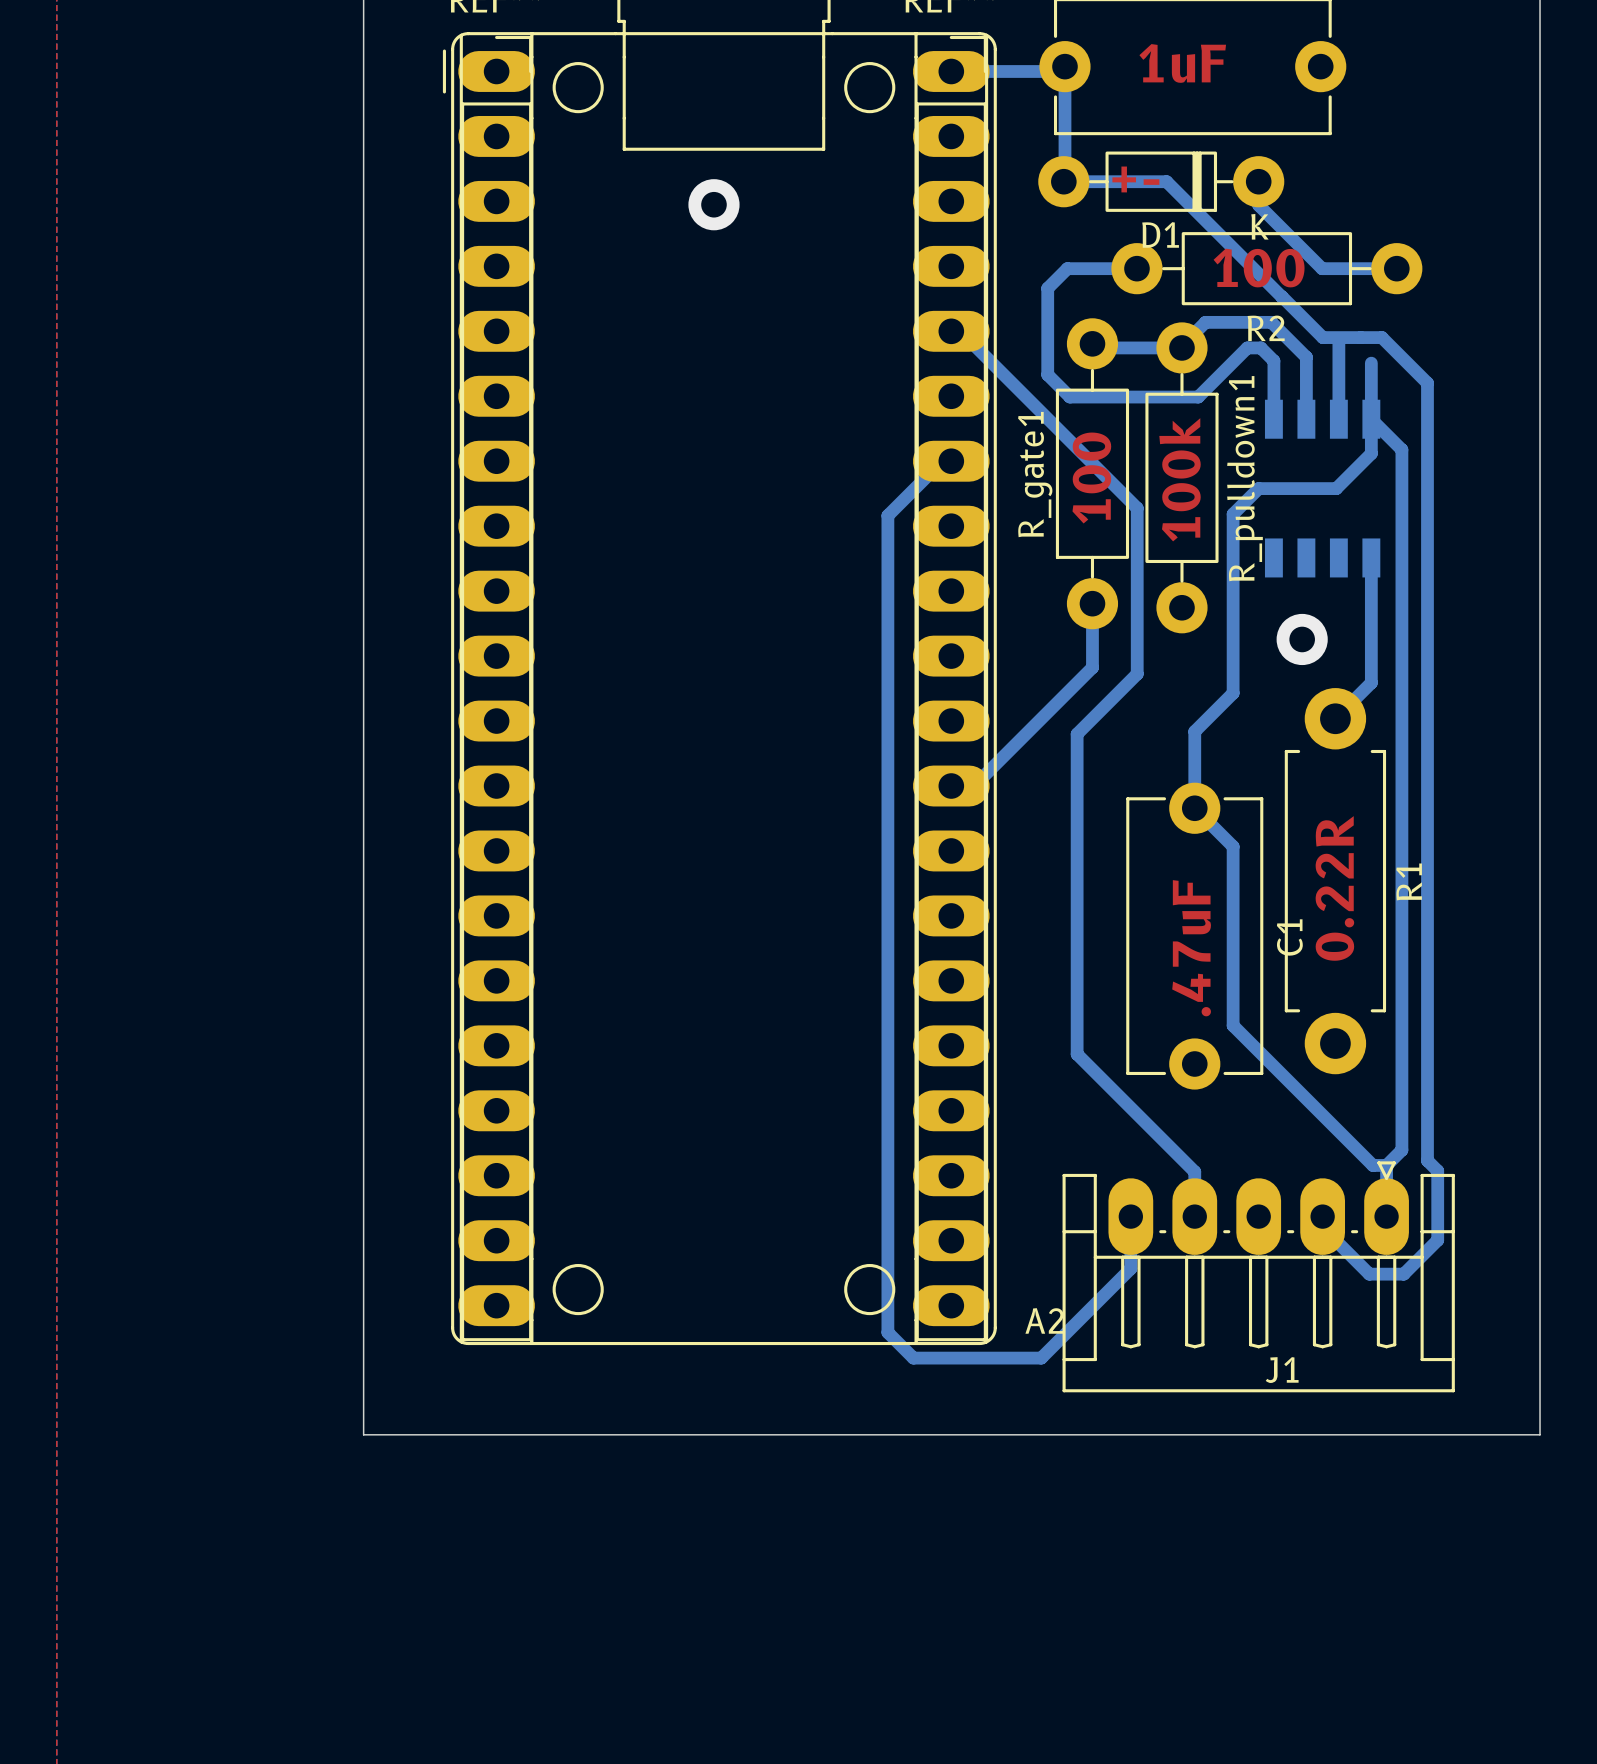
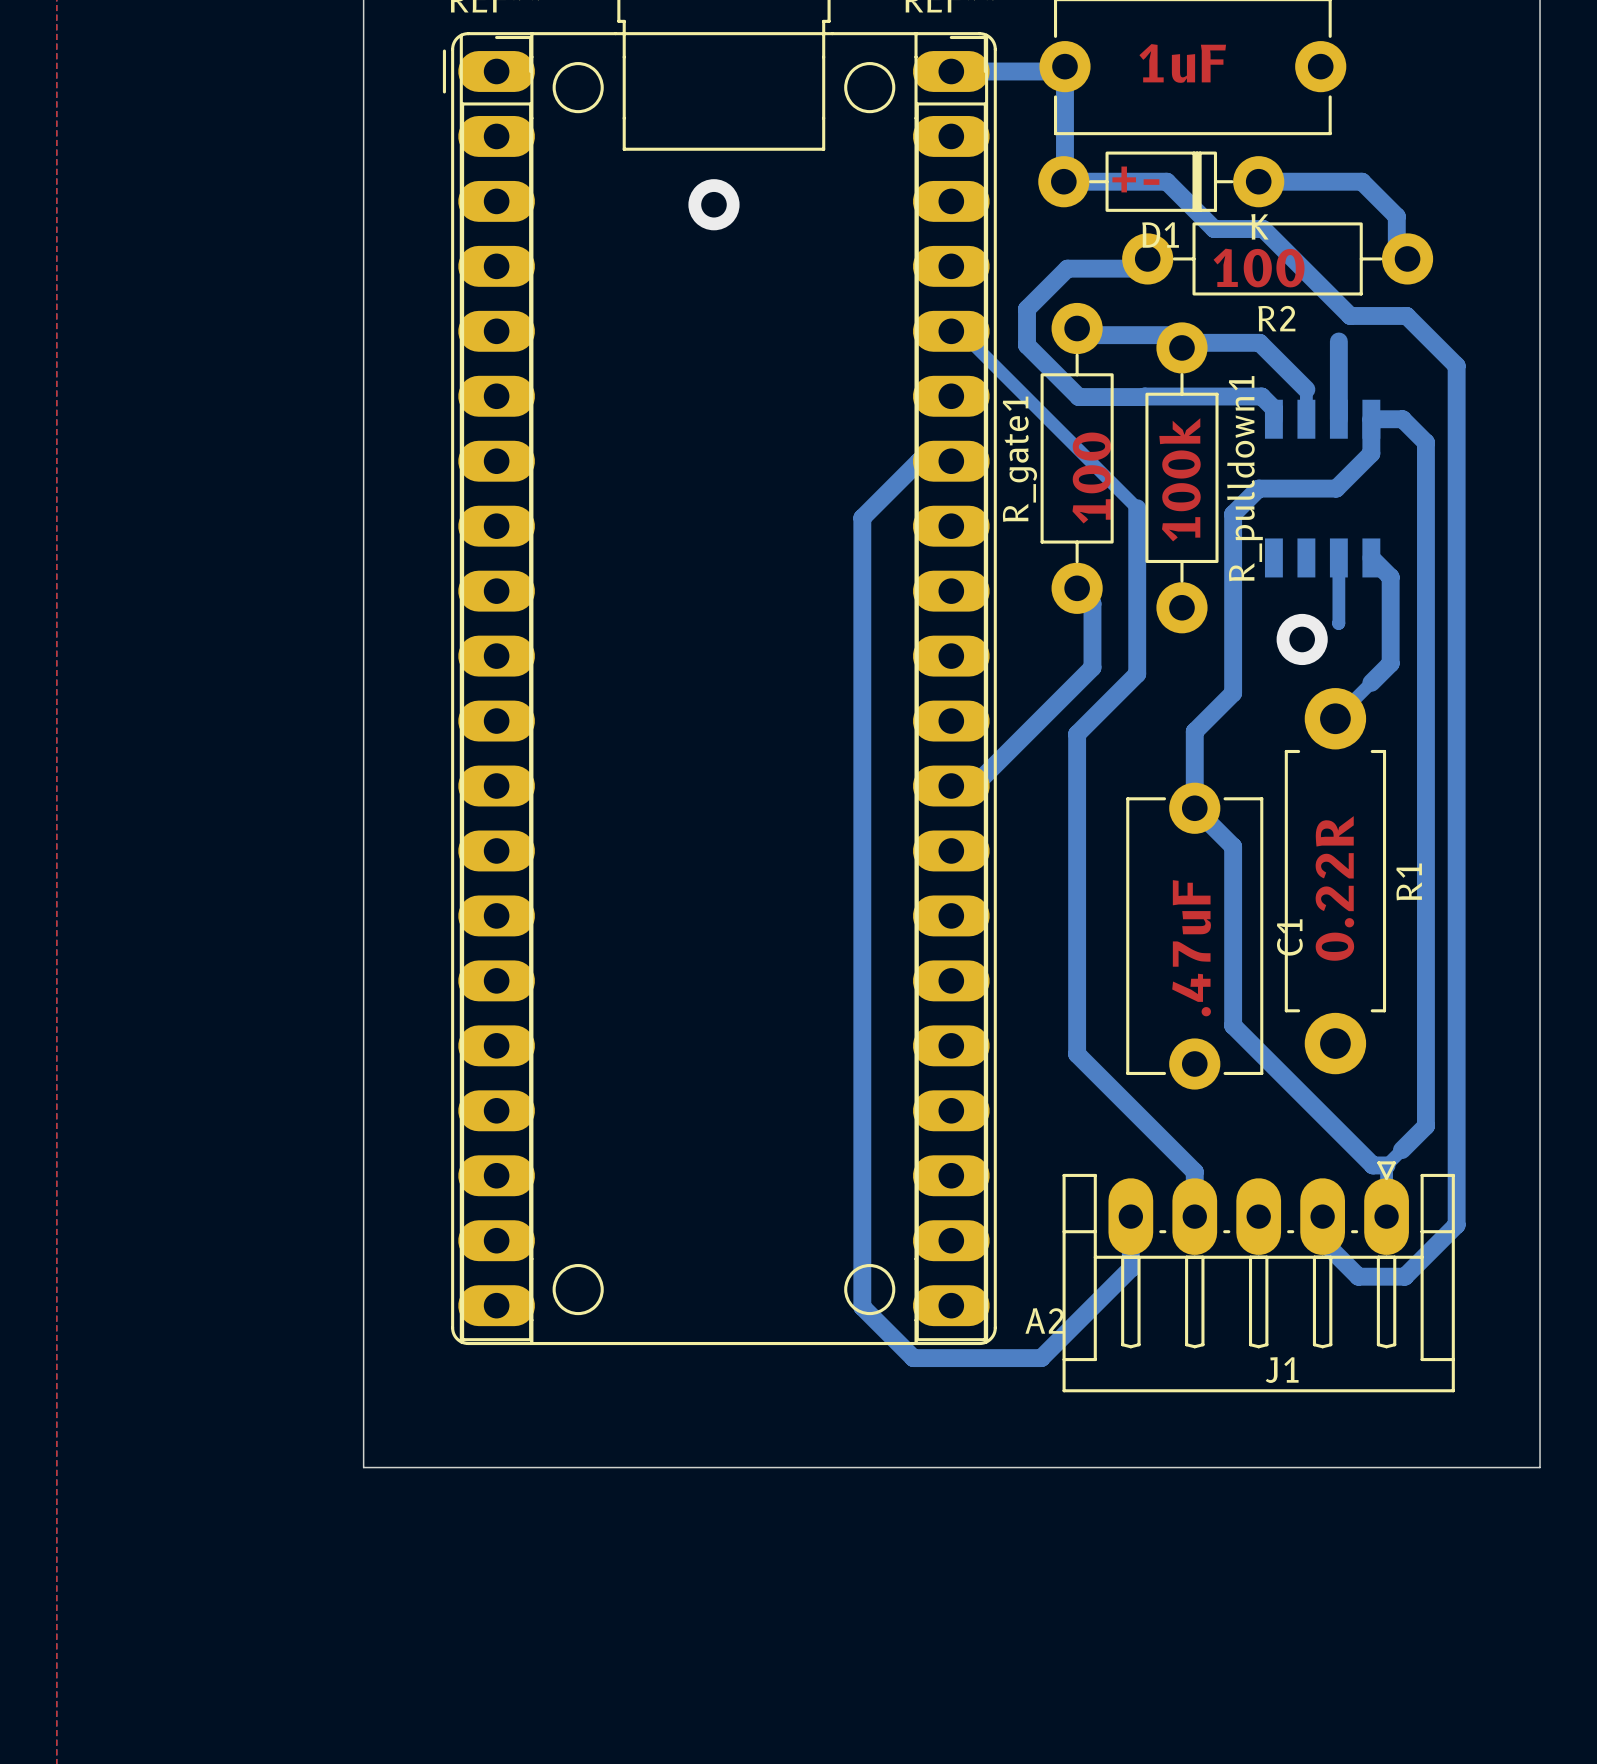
bottom track width: thin (951, 71) (1060, 71) (1064, 66) (1063, 181) (1166, 181) -> thick (951, 71) (1060, 71) (1064, 66) (1063, 181) (1166, 181)
bottom track: (1166, 181) (1281, 296) -> none
bottom track: (1258, 181) (1258, 205) (1322, 268) (1396, 268) -> (1258, 181) (1362, 181) (1396, 216) (1396, 248) (1407, 258)
bottom track width: thin (1136, 268) (1067, 268) (1047, 288) -> thick (1136, 268) (1067, 268) (1047, 288)
R2 position: (1266, 268) -> (1277, 258)
bottom track: (1047, 288) (1047, 374) (1069, 397) (1078, 397) -> (1047, 288) (1027, 309) (1027, 345) (1078, 397)
bottom track: (1282, 296) (1322, 337) (1381, 337) (1427, 383) (1427, 1160) (1437, 1170) (1437, 1240) (1403, 1274) (1369, 1274) (1322, 1227) -> (1166, 181) (1214, 229) (1263, 229) (1350, 315) (1406, 315) (1456, 365) (1456, 1224) (1404, 1276) (1358, 1276) (1322, 1240) (1322, 1227)
bottom track: none -> (1077, 328) (1083, 335) (1175, 335) (1184, 343)
bottom track width: thin (1338, 341) (1338, 419) -> thick (1338, 341) (1338, 419)
bottom track: (1092, 343) (1096, 347) (1181, 347) (1205, 322) (1271, 322) (1306, 357) (1306, 389) -> (1185, 342) (1259, 342) (1306, 389)
bottom track: (1371, 363) (1371, 419) (1401, 449) (1401, 1150) -> (1371, 419) (1402, 419) (1425, 442) (1425, 1126) (1401, 1150)
bottom track width: thin (1078, 397) (1144, 397) -> thick (1078, 397) (1144, 397)
bottom track: (1144, 397) (1198, 397) (1247, 347) (1260, 347) (1273, 360) (1273, 408) -> (1144, 397) (1261, 396) (1273, 408)
bottom track width: thin (1371, 419) (1371, 453) (1336, 488) (1258, 488) (1233, 514) (1233, 693) (1194, 731) (1194, 808) (1233, 846) (1233, 1025) (1372, 1165) (1386, 1165) -> thick (1371, 419) (1371, 453) (1336, 488) (1258, 488) (1233, 514) (1233, 693) (1194, 731) (1194, 808) (1233, 846) (1233, 1025) (1372, 1165) (1386, 1165)
bottom track: (942, 461) (887, 515) (887, 1332) -> (942, 461) (919, 461) (862, 518) (862, 1306) (887, 1332)
R_gate1 position: (1092, 473) -> (1077, 458)
bottom track width: thin (1137, 508) (1137, 674) (1077, 734) (1077, 1054) (1194, 1171) (1194, 1216) -> thick (1137, 508) (1137, 674) (1077, 734) (1077, 1054) (1194, 1171) (1194, 1216)
bottom track: none -> (1338, 557) (1338, 623)
bottom track: (1371, 557) (1371, 682) -> (1371, 557) (1390, 577) (1390, 663) (1371, 682)
bottom track width: thin (1092, 603) (1092, 667) (974, 786) (951, 786) -> thick (1092, 603) (1092, 667) (974, 786) (951, 786)
bottom track width: thin (1130, 1216) (1130, 1268) (1041, 1358) (913, 1358) (887, 1332) -> thick (1130, 1216) (1130, 1268) (1041, 1358) (913, 1358) (887, 1332)
board edge: (363, 1434) (1540, 1434) -> (363, 1434) (363, 1467) (1540, 1467) (1540, 1434)

